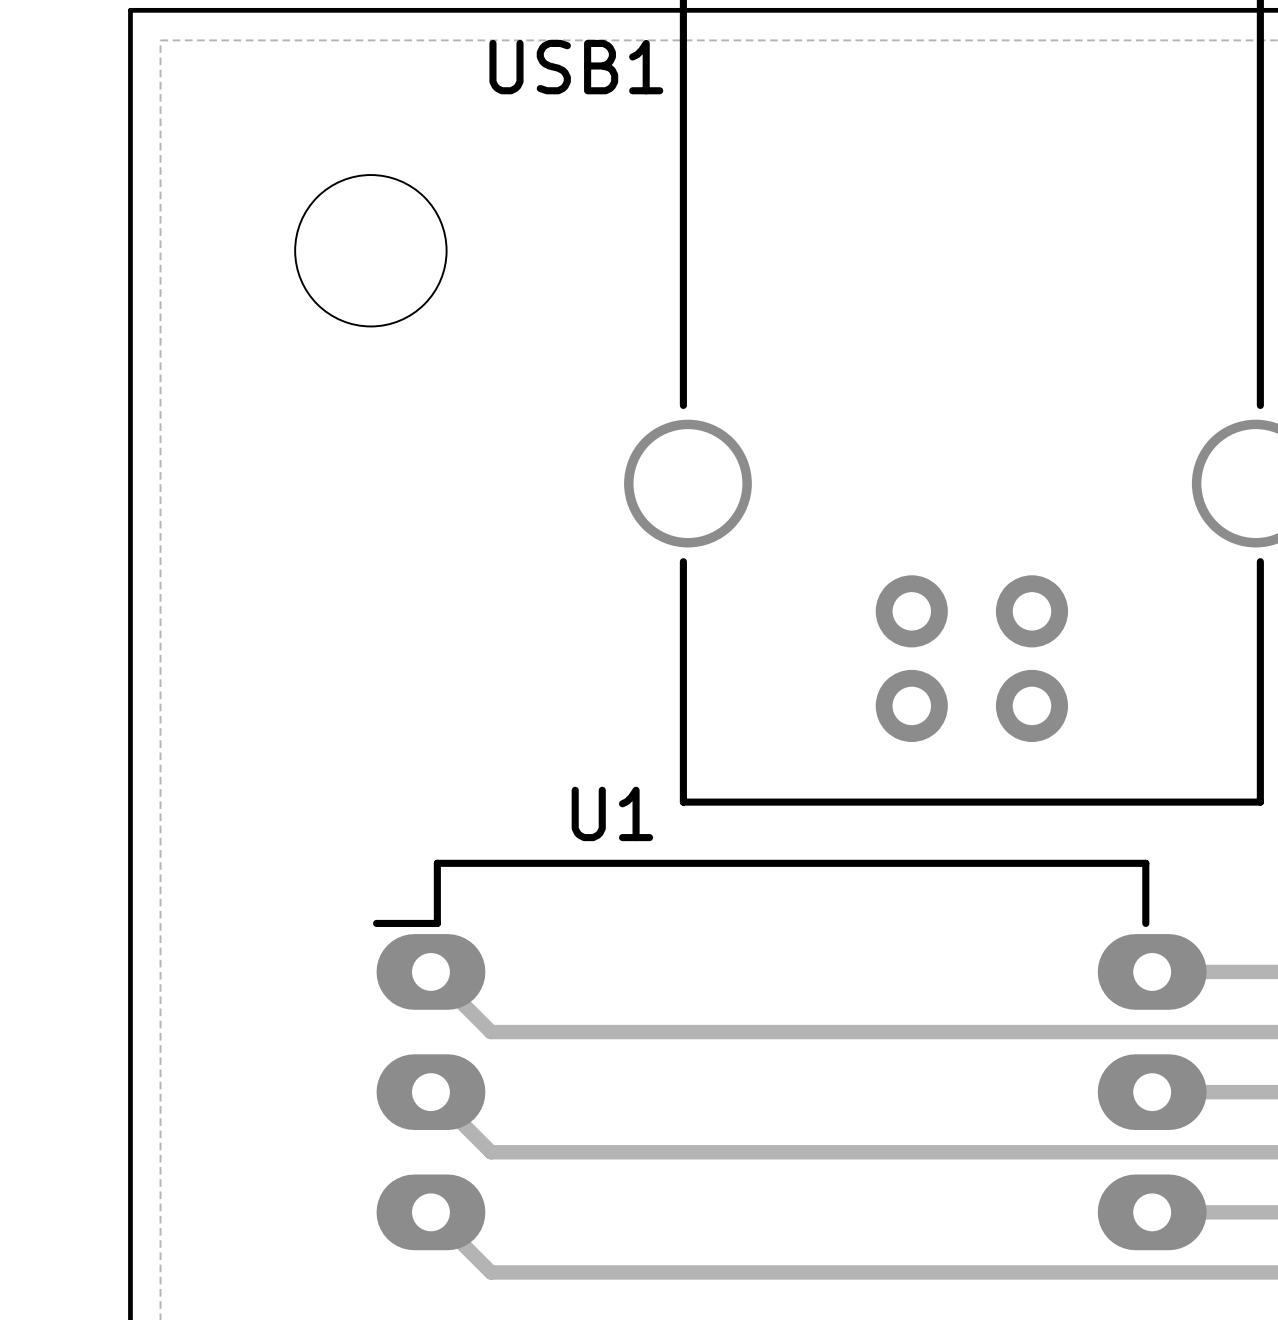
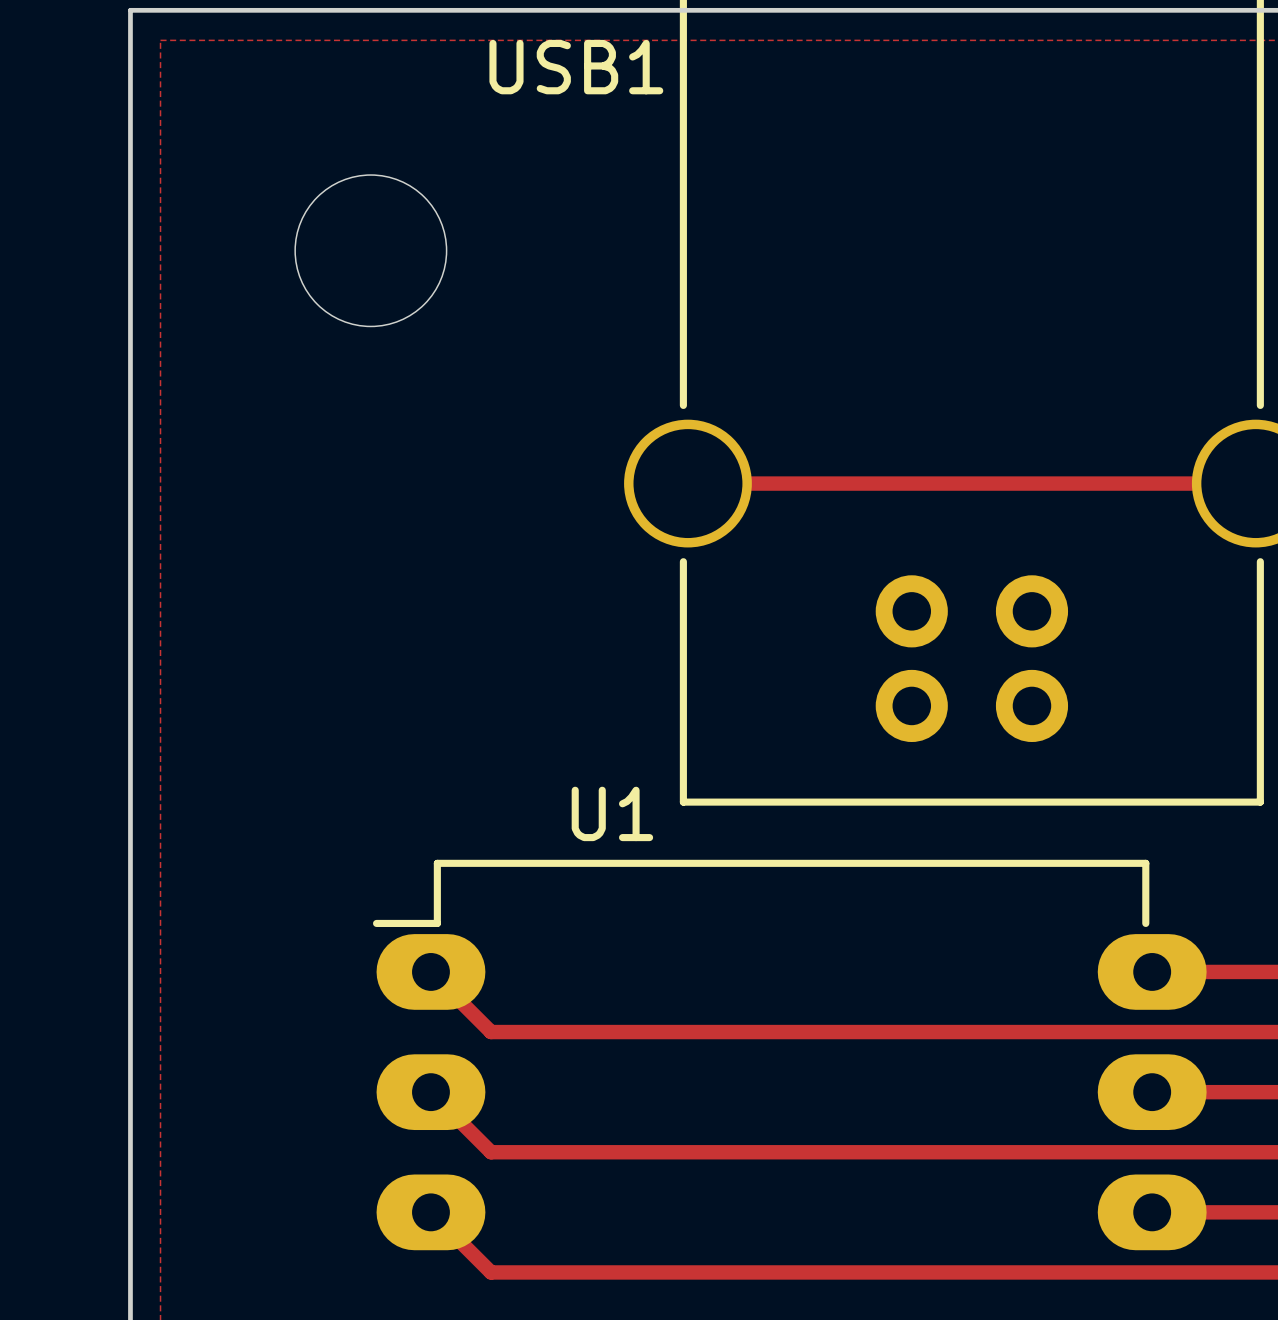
track: none -> (687, 483) (1255, 483)

